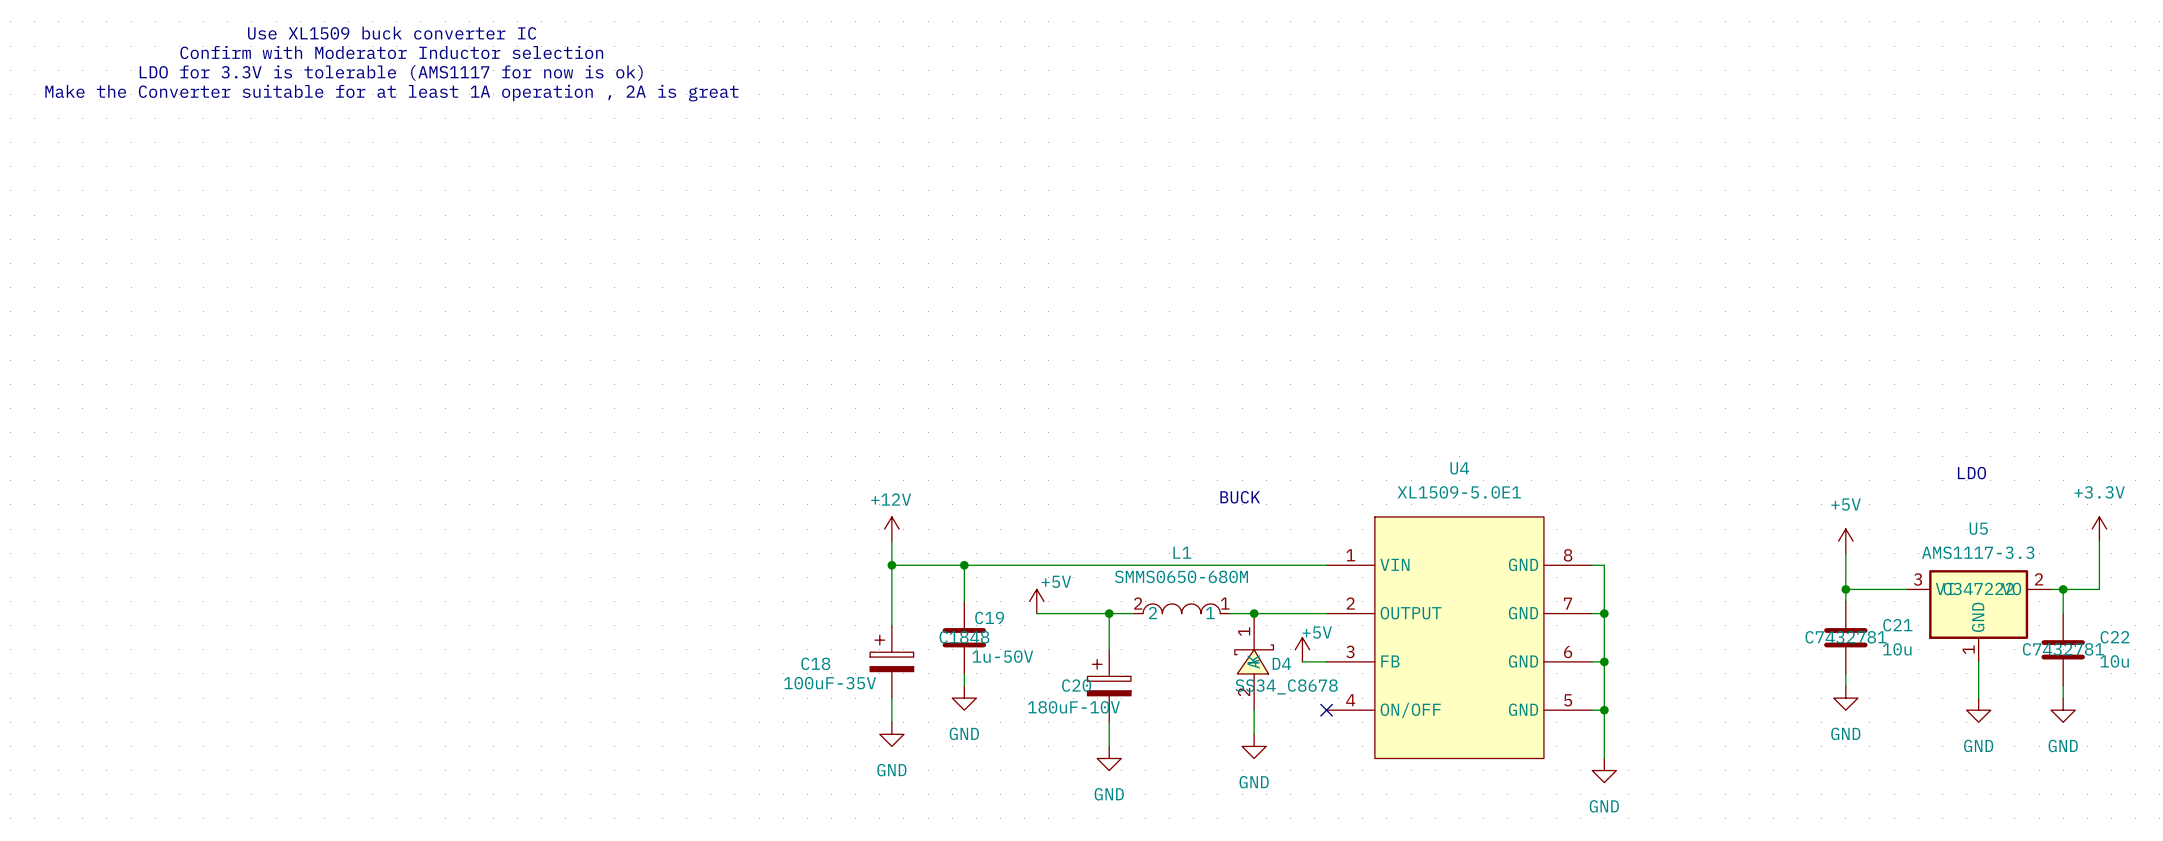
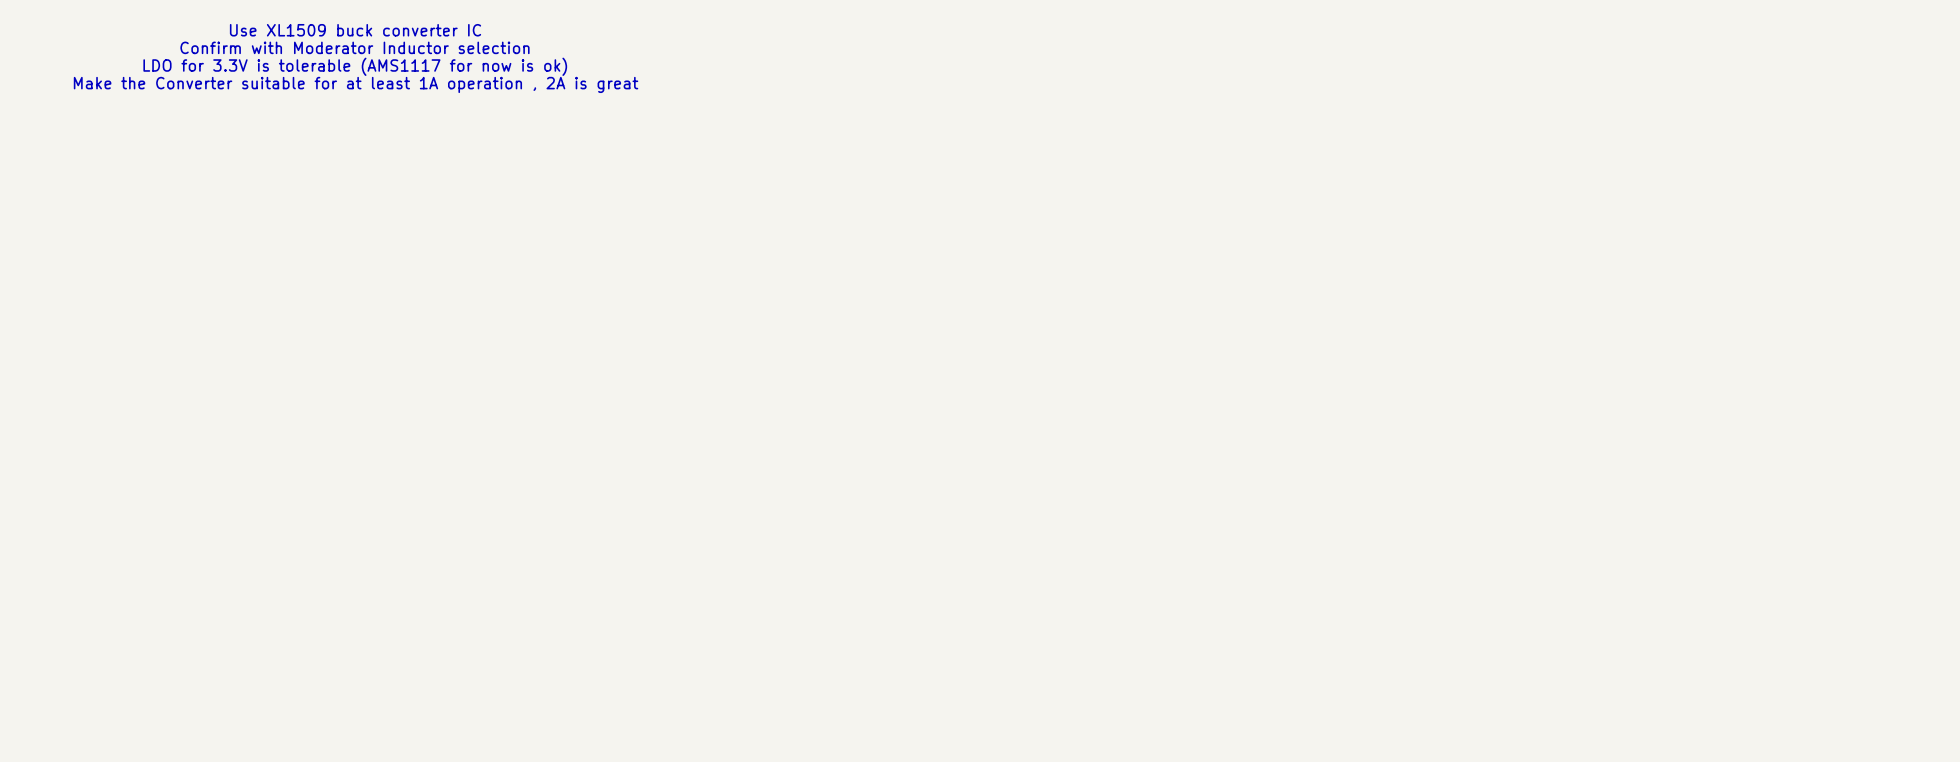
text: LDO (1971, 473) -> none
text: BUCK (1240, 497) -> none
power symbol: +12V (891, 529) -> none
power symbol: +3.3V (2099, 529) -> none
wire: (891, 541) (891, 625) -> none
power symbol: +5V (1845, 541) -> none
wire: (2099, 541) (2099, 589) (2051, 589) -> none
wire: (1845, 553) (1845, 601) -> none
wire: (891, 565) (1326, 565) -> none
junction: (891, 565) -> none
wire: (964, 565) (964, 601) -> none
junction: (964, 565) -> none
wire: (1592, 565) (1604, 565) (1604, 758) -> none
wire: (1845, 589) (1906, 589) -> none
junction: (1845, 589) -> none
wire: (2063, 589) (2063, 613) -> none
junction: (2063, 589) -> none
power symbol: +5V (1036, 601) -> none
L1: SMMS0650-680M (1181, 608) -> none
wire: (1036, 613) (1133, 613) -> none
wire: (1109, 613) (1109, 649) -> none
junction: (1109, 613) -> none
wire: (1229, 613) (1326, 613) -> none
junction: (1254, 613) -> none
wire: (1592, 613) (1604, 613) -> none
junction: (1604, 613) -> none
U5: AMS1117-3.3 (1978, 616) -> none
C19: 1u-50V (964, 637) -> none
U4: XL1509-5.0E1 (1459, 637) -> none
C21: 10u (1845, 637) -> none
power symbol: +5V (1302, 649) -> none
C22: 10u (2063, 649) -> none
C18: 100uF-35V (891, 661) -> none
D4: SS34_C8678 (1254, 661) -> none
wire: (1302, 661) (1326, 661) -> none
wire: (1592, 661) (1604, 661) -> none
junction: (1604, 661) -> none
wire: (1978, 661) (1978, 698) -> none
wire: (964, 673) (964, 686) -> none
wire: (1845, 673) (1845, 686) -> none
C20: 180uF-10V (1109, 686) -> none
wire: (2063, 686) (2063, 698) -> none
wire: (891, 698) (891, 722) -> none
power symbol: GND (964, 698) -> none
power symbol: GND (1845, 698) -> none
wire: (1254, 710) (1254, 734) -> none
no-connect mark: (1326, 710) -> none
wire: (1592, 710) (1604, 710) -> none
junction: (1604, 710) -> none
power symbol: GND (1978, 710) -> none
power symbol: GND (2063, 710) -> none
wire: (1109, 722) (1109, 746) -> none
power symbol: GND (891, 734) -> none
power symbol: GND (1254, 746) -> none
power symbol: GND (1109, 758) -> none
power symbol: GND (1604, 770) -> none

